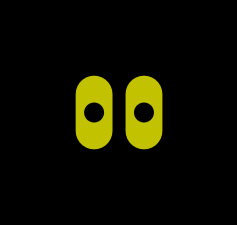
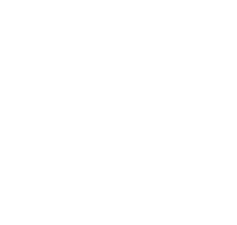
part: (119, 112) -> none

